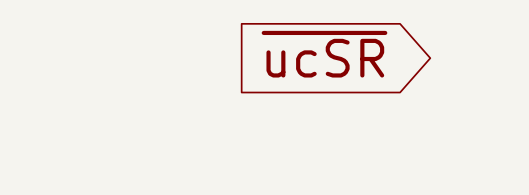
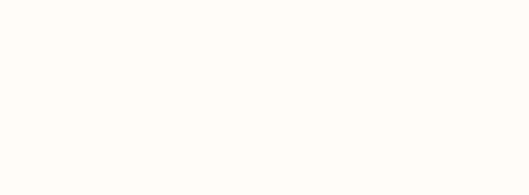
global label: ~{ucSR} (324, 54) -> none

